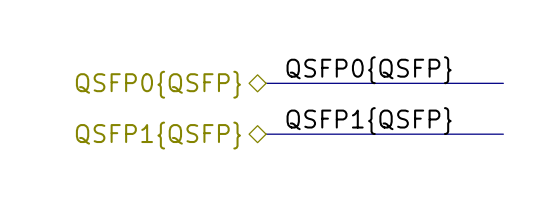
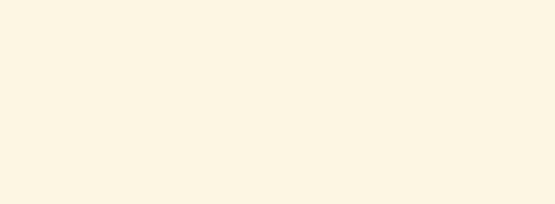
label: QSFP0{QSFP} (369, 70) -> none
bus: (266, 83) (503, 83) -> none
hierarchical label: QSFP0{QSFP} (158, 84) -> none
label: QSFP1{QSFP} (369, 121) -> none
bus: (266, 134) (503, 134) -> none
hierarchical label: QSFP1{QSFP} (158, 135) -> none

